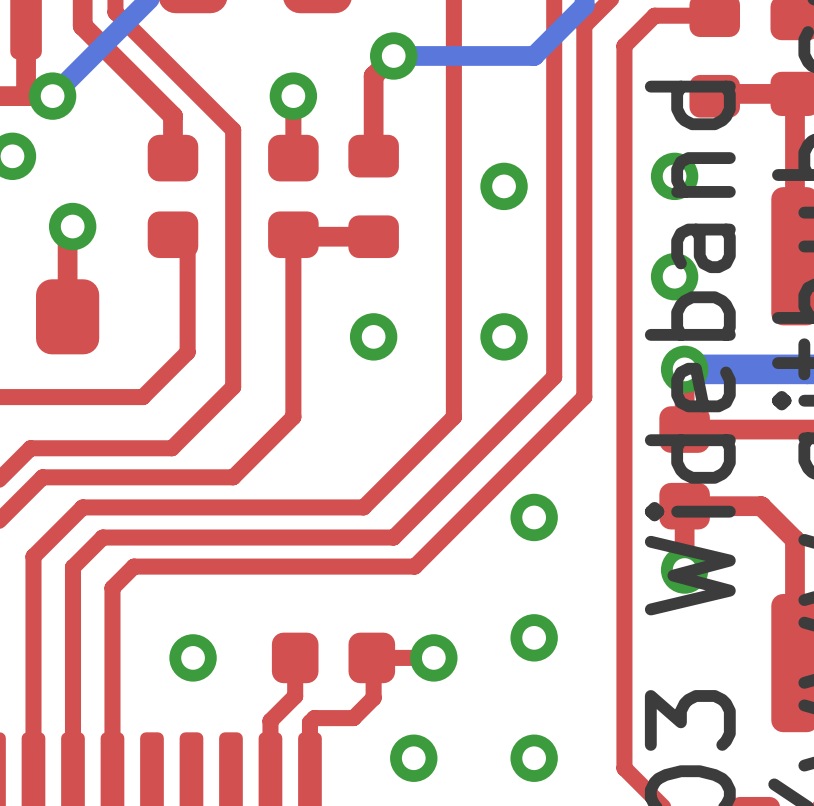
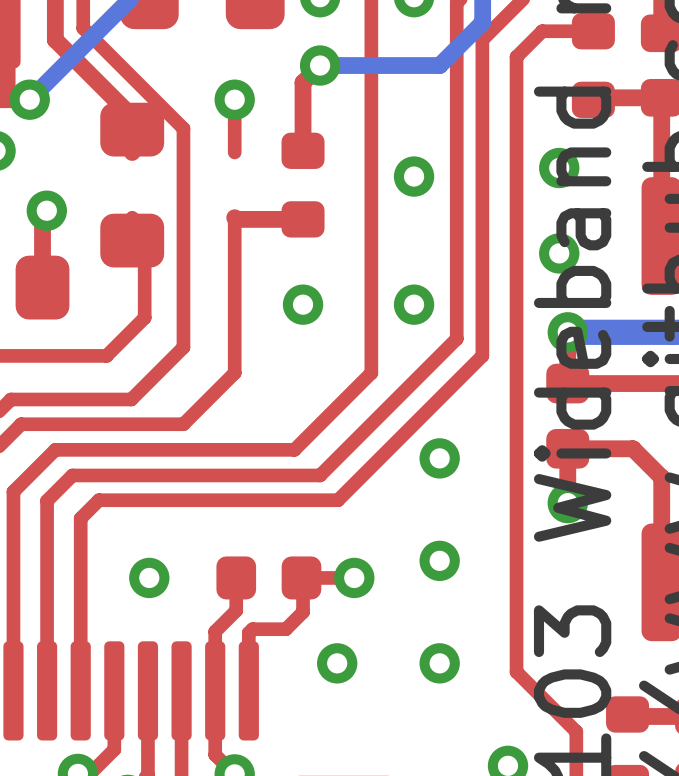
part footprint: [147, 134, 199, 259] -> [100, 102, 165, 268]
part: (293, 196) -> none

